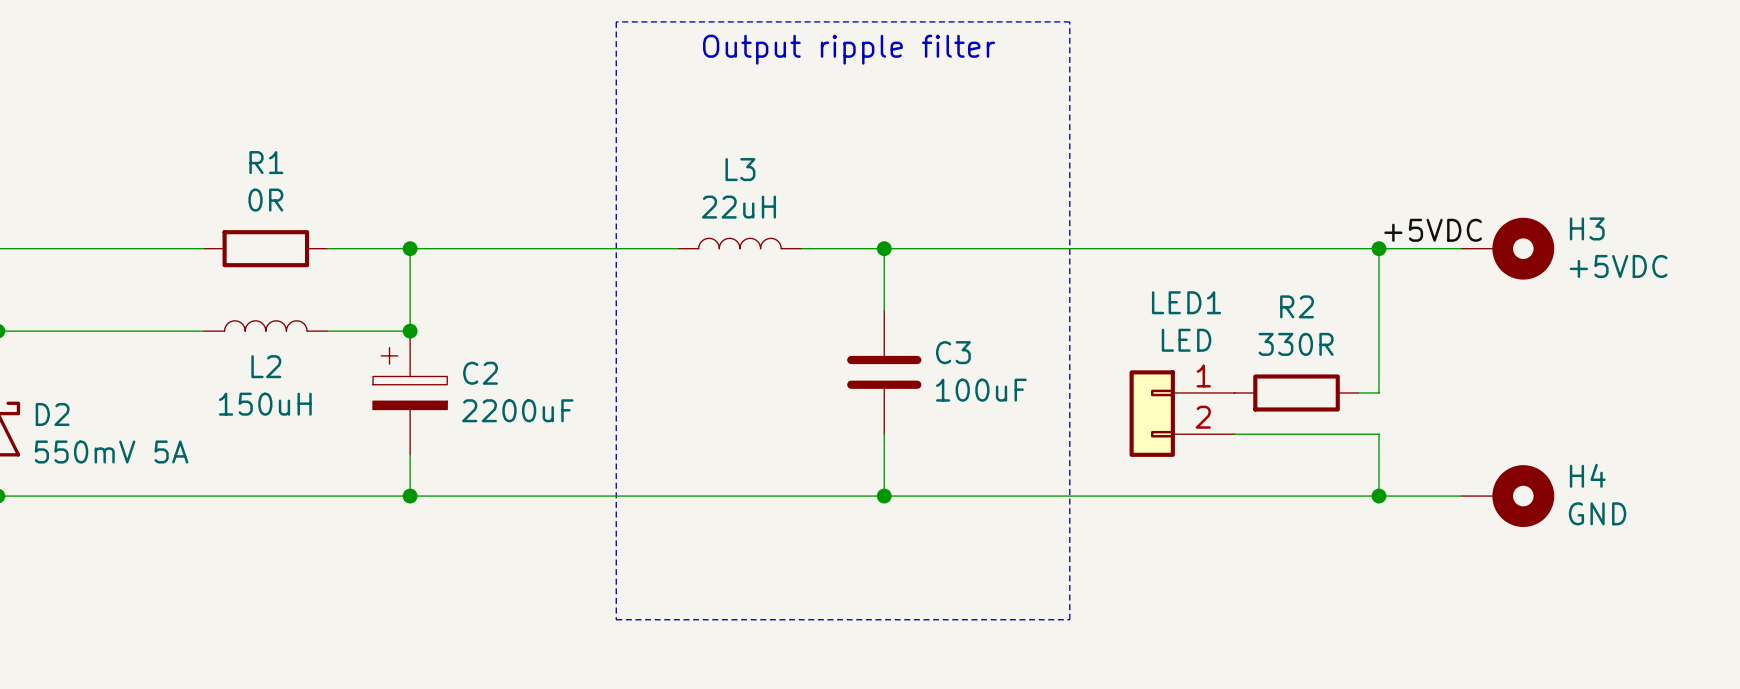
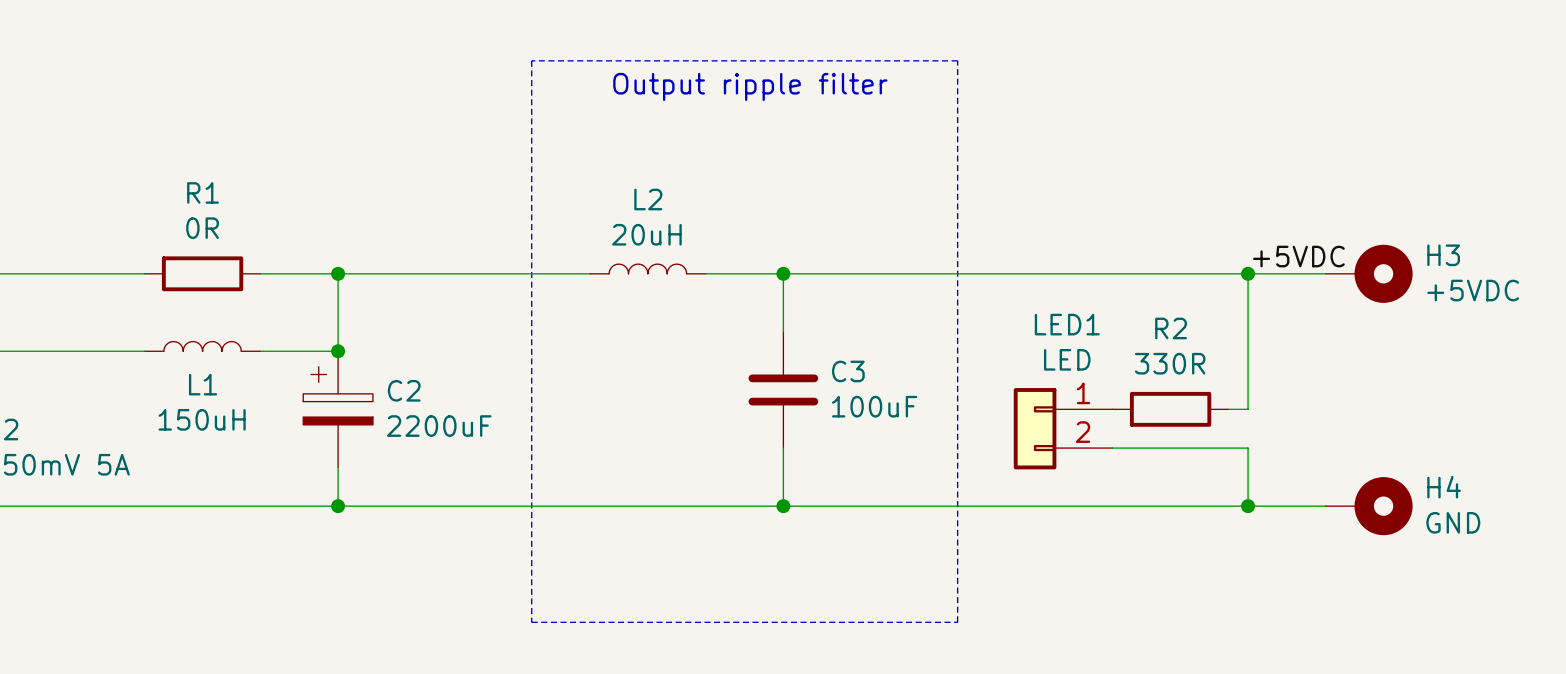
L3 name: L3 (740, 169) -> L2 (648, 199)
L3 value: 22uH (738, 207) -> 20uH (646, 234)
L2 name: L2 (266, 366) -> L1 (203, 384)

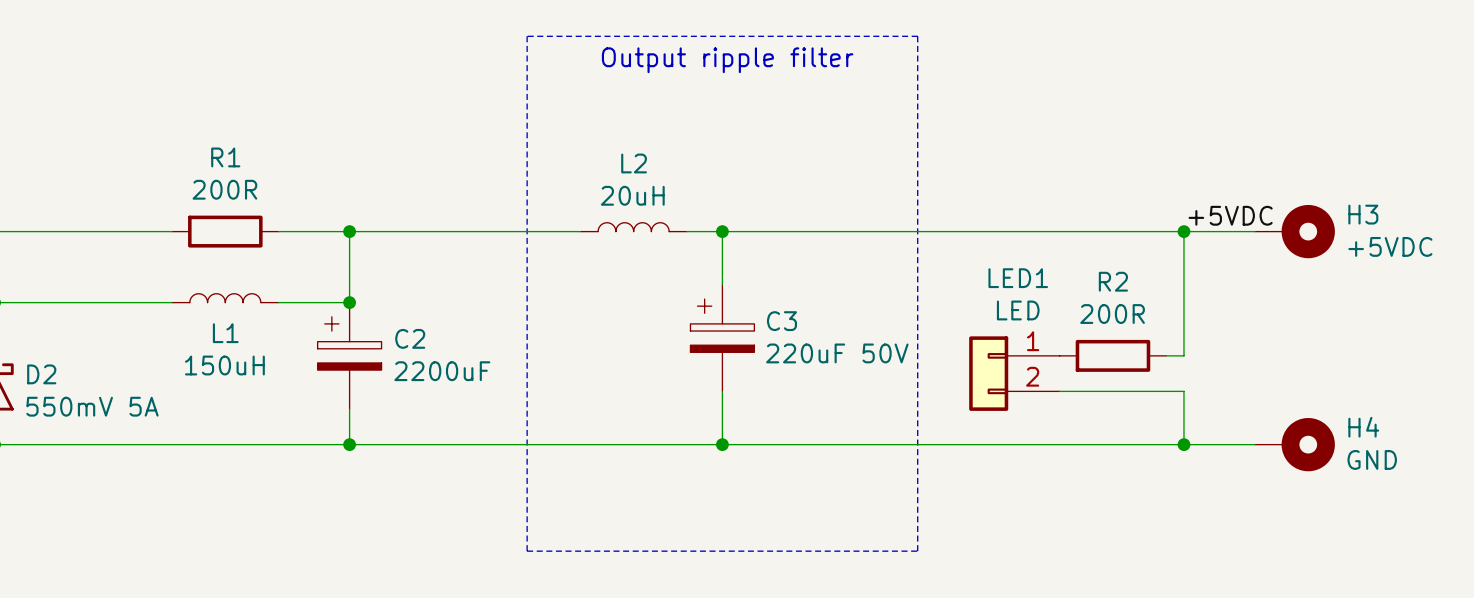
R1 value: 0R (202, 228) -> 200R (224, 189)
wire: (783, 273) (783, 331) -> (722, 231) (722, 284)
junction position: (783, 273) -> (722, 231)
C3 symbol: [748, 331, 819, 449] -> [690, 284, 755, 392]
R2 value: 330R (1170, 363) -> 200R (1112, 314)
C3 value: 100uF (874, 406) -> 220uF 50V (837, 353)
wire: (783, 448) (783, 506) -> (722, 391) (722, 444)
junction position: (783, 506) -> (722, 444)

